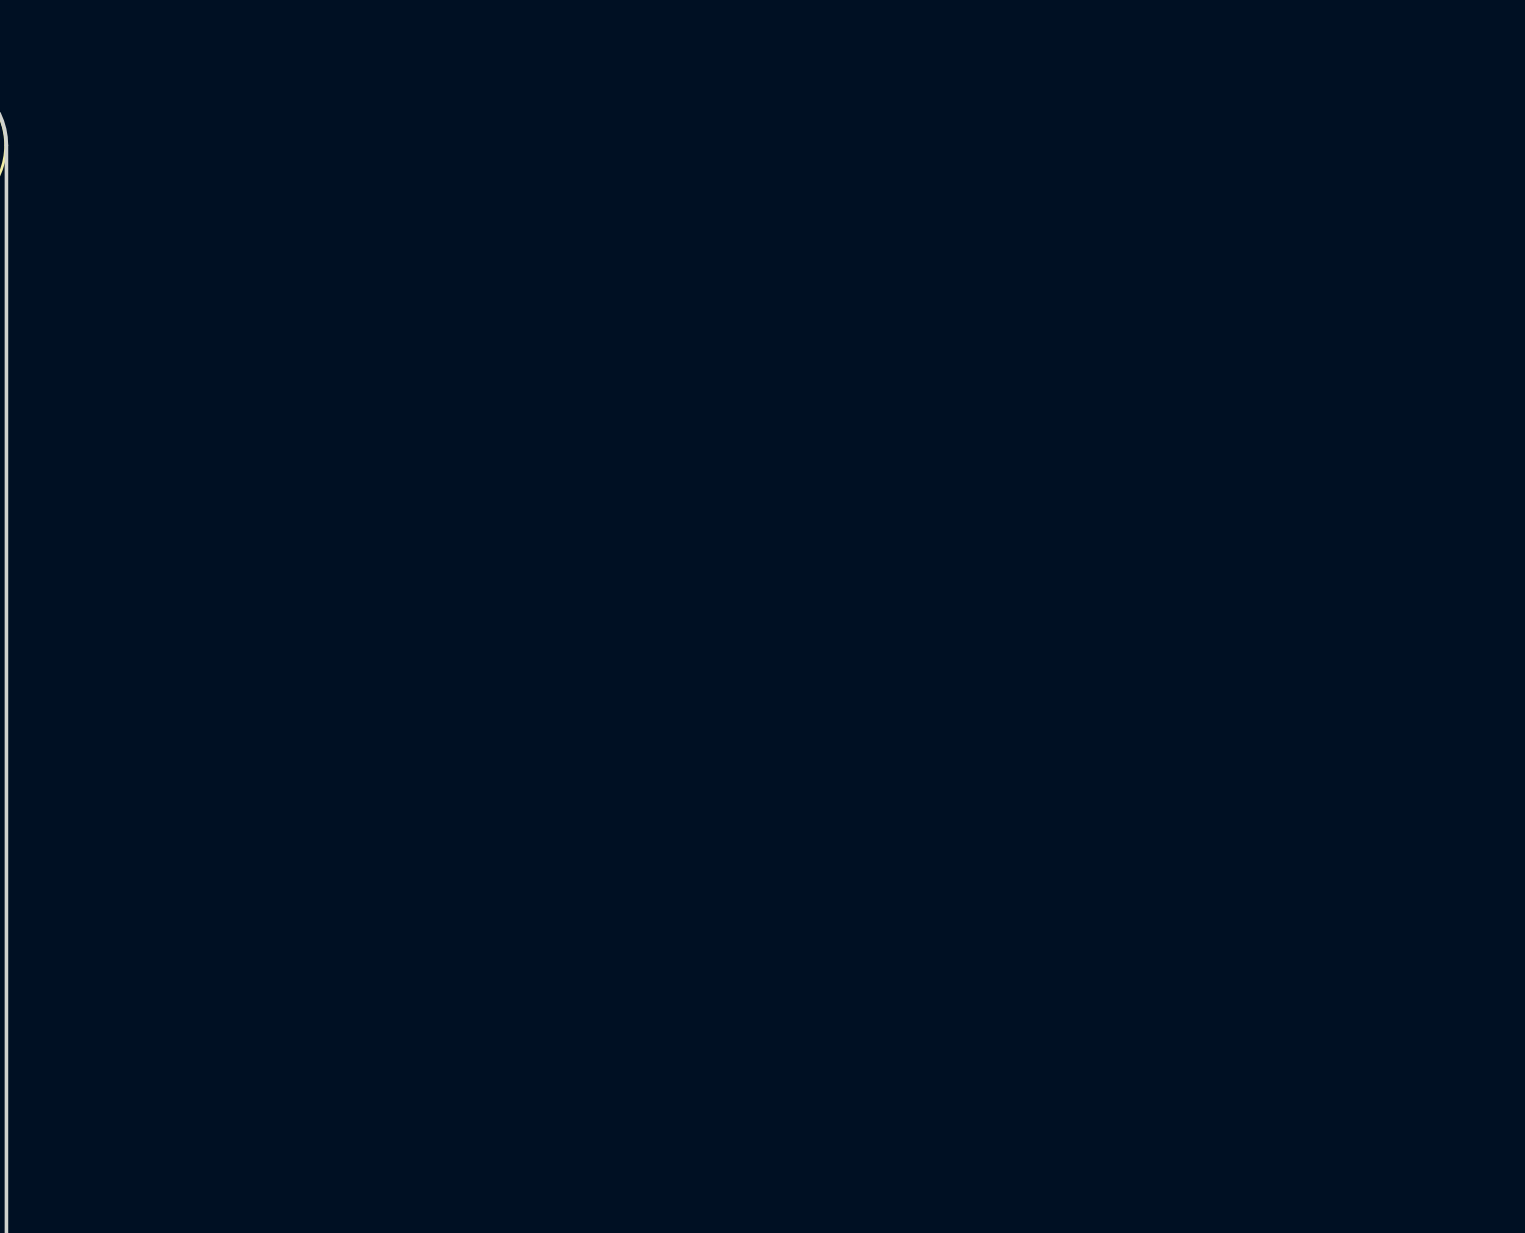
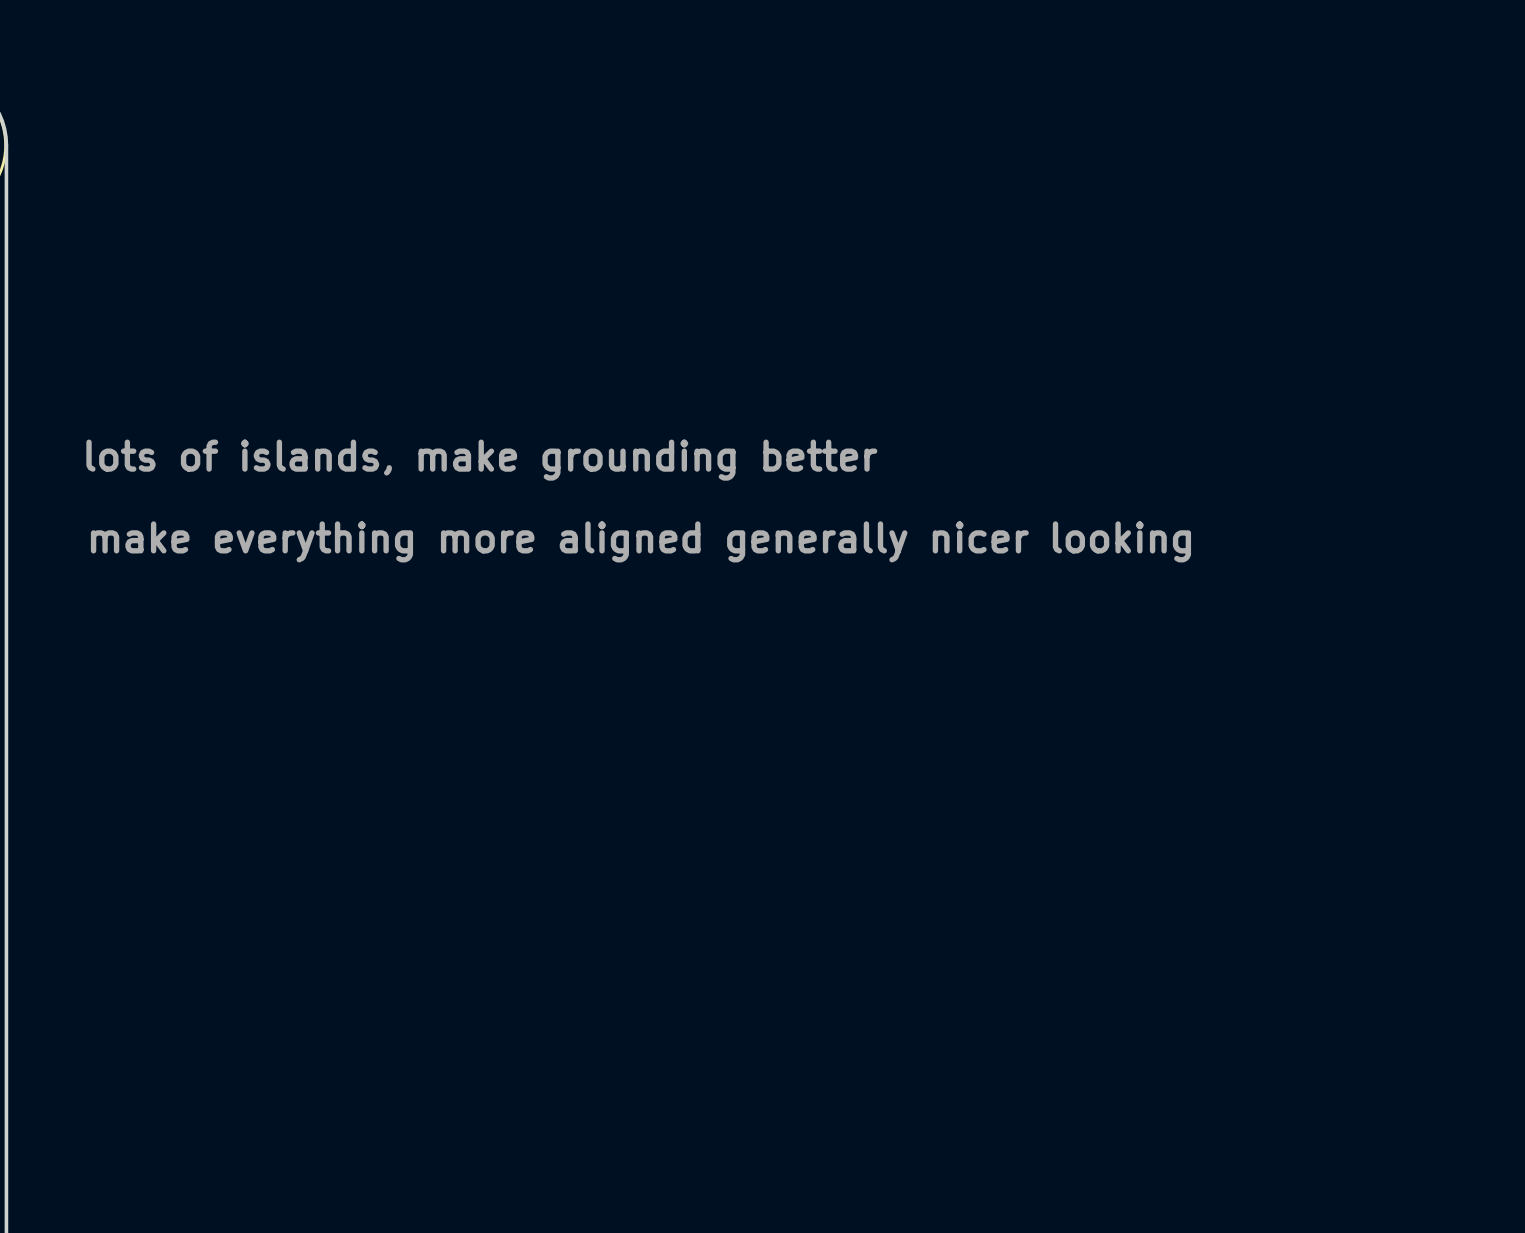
text: none -> lots of islands, make grounding better (481, 460)
text: none -> make everything more aligned generally nicer looking (640, 541)

